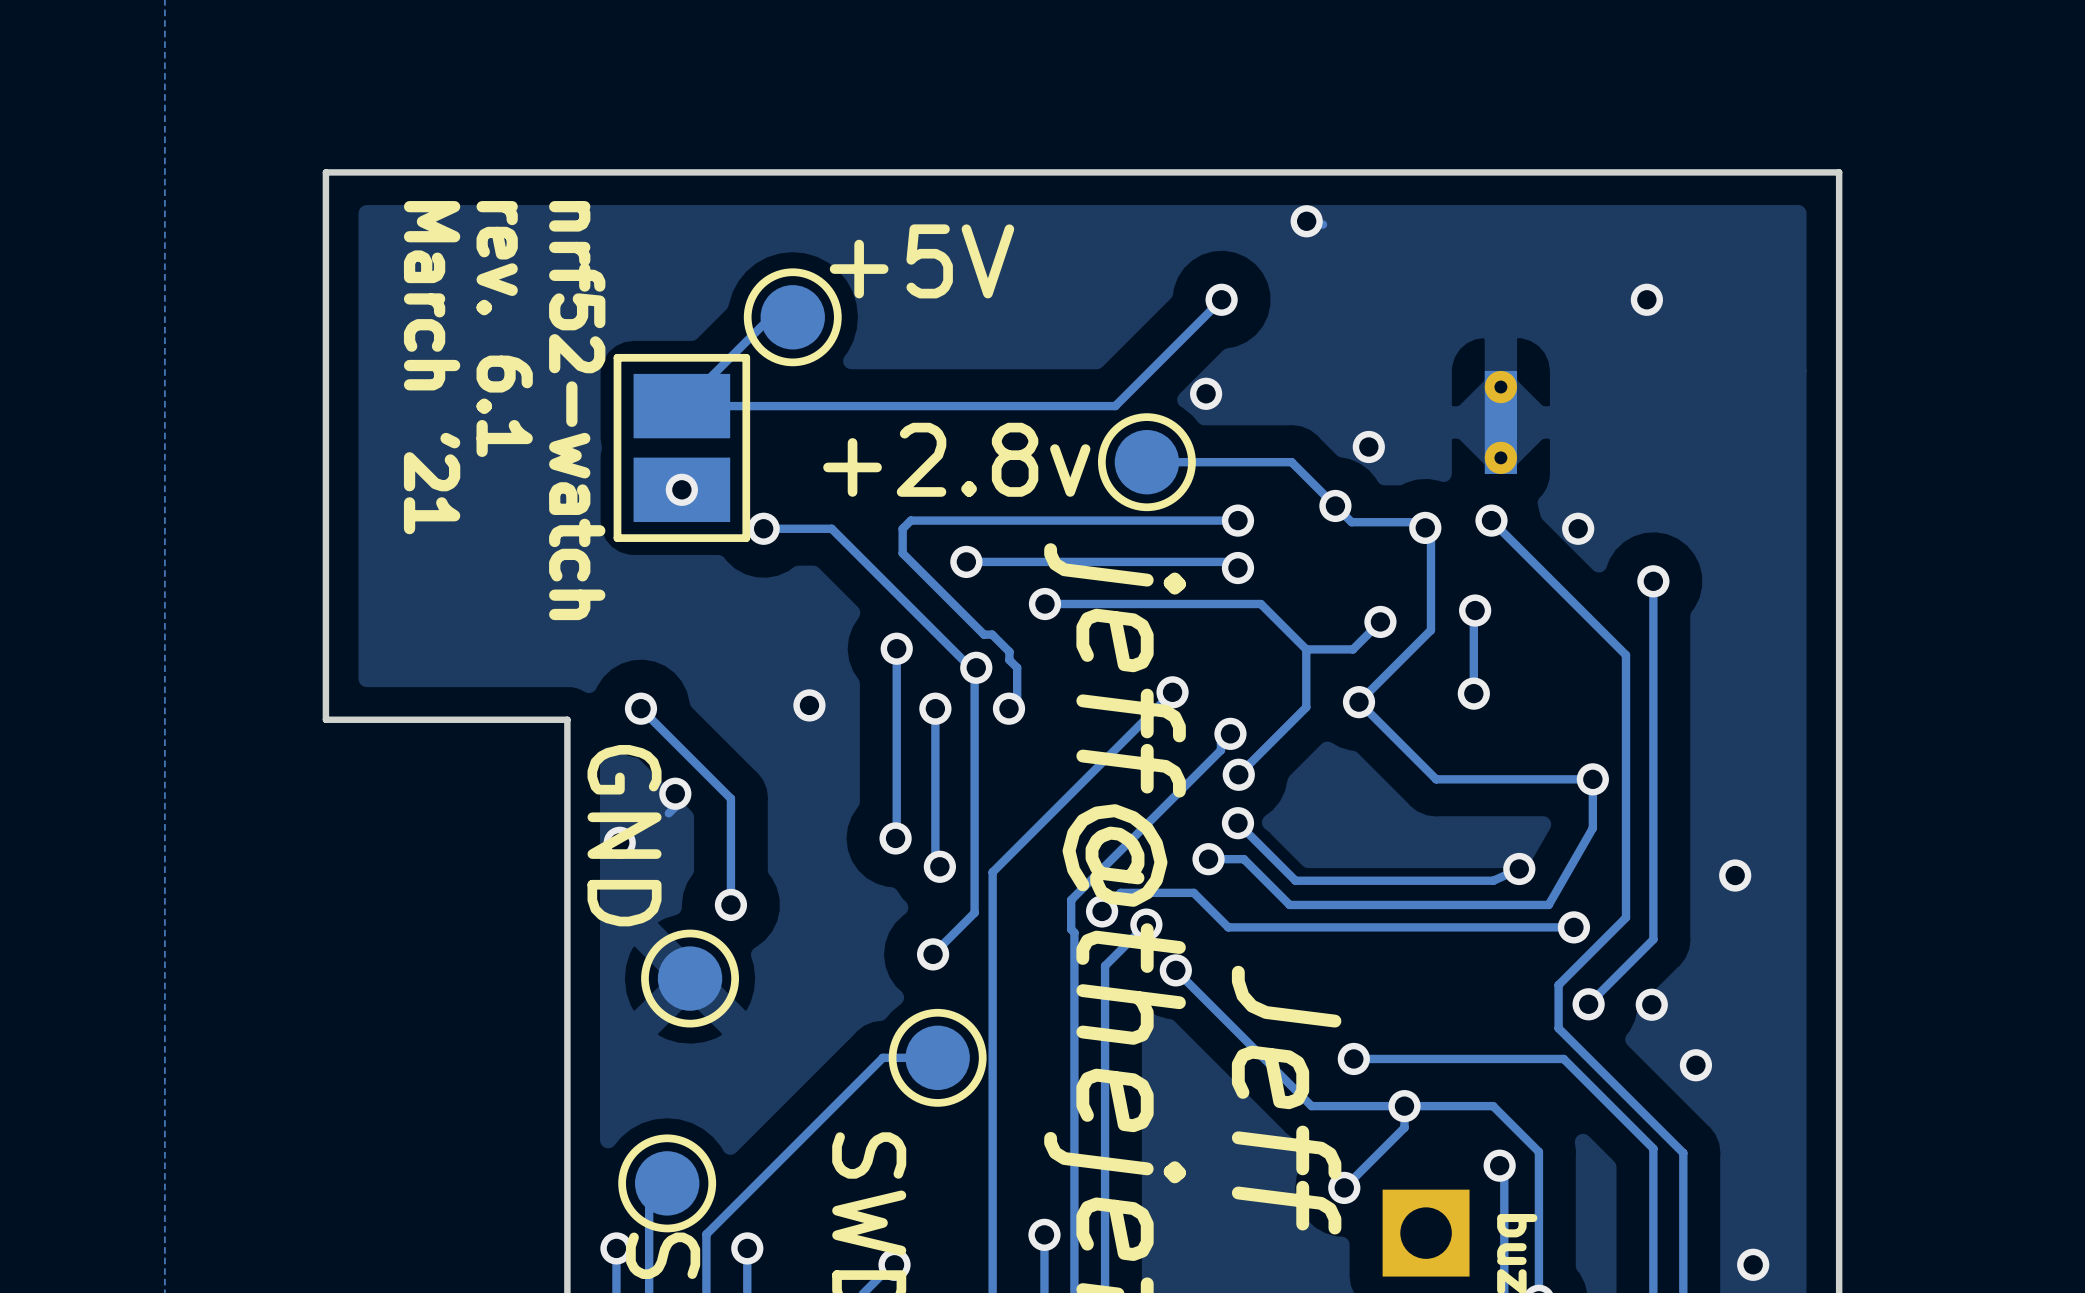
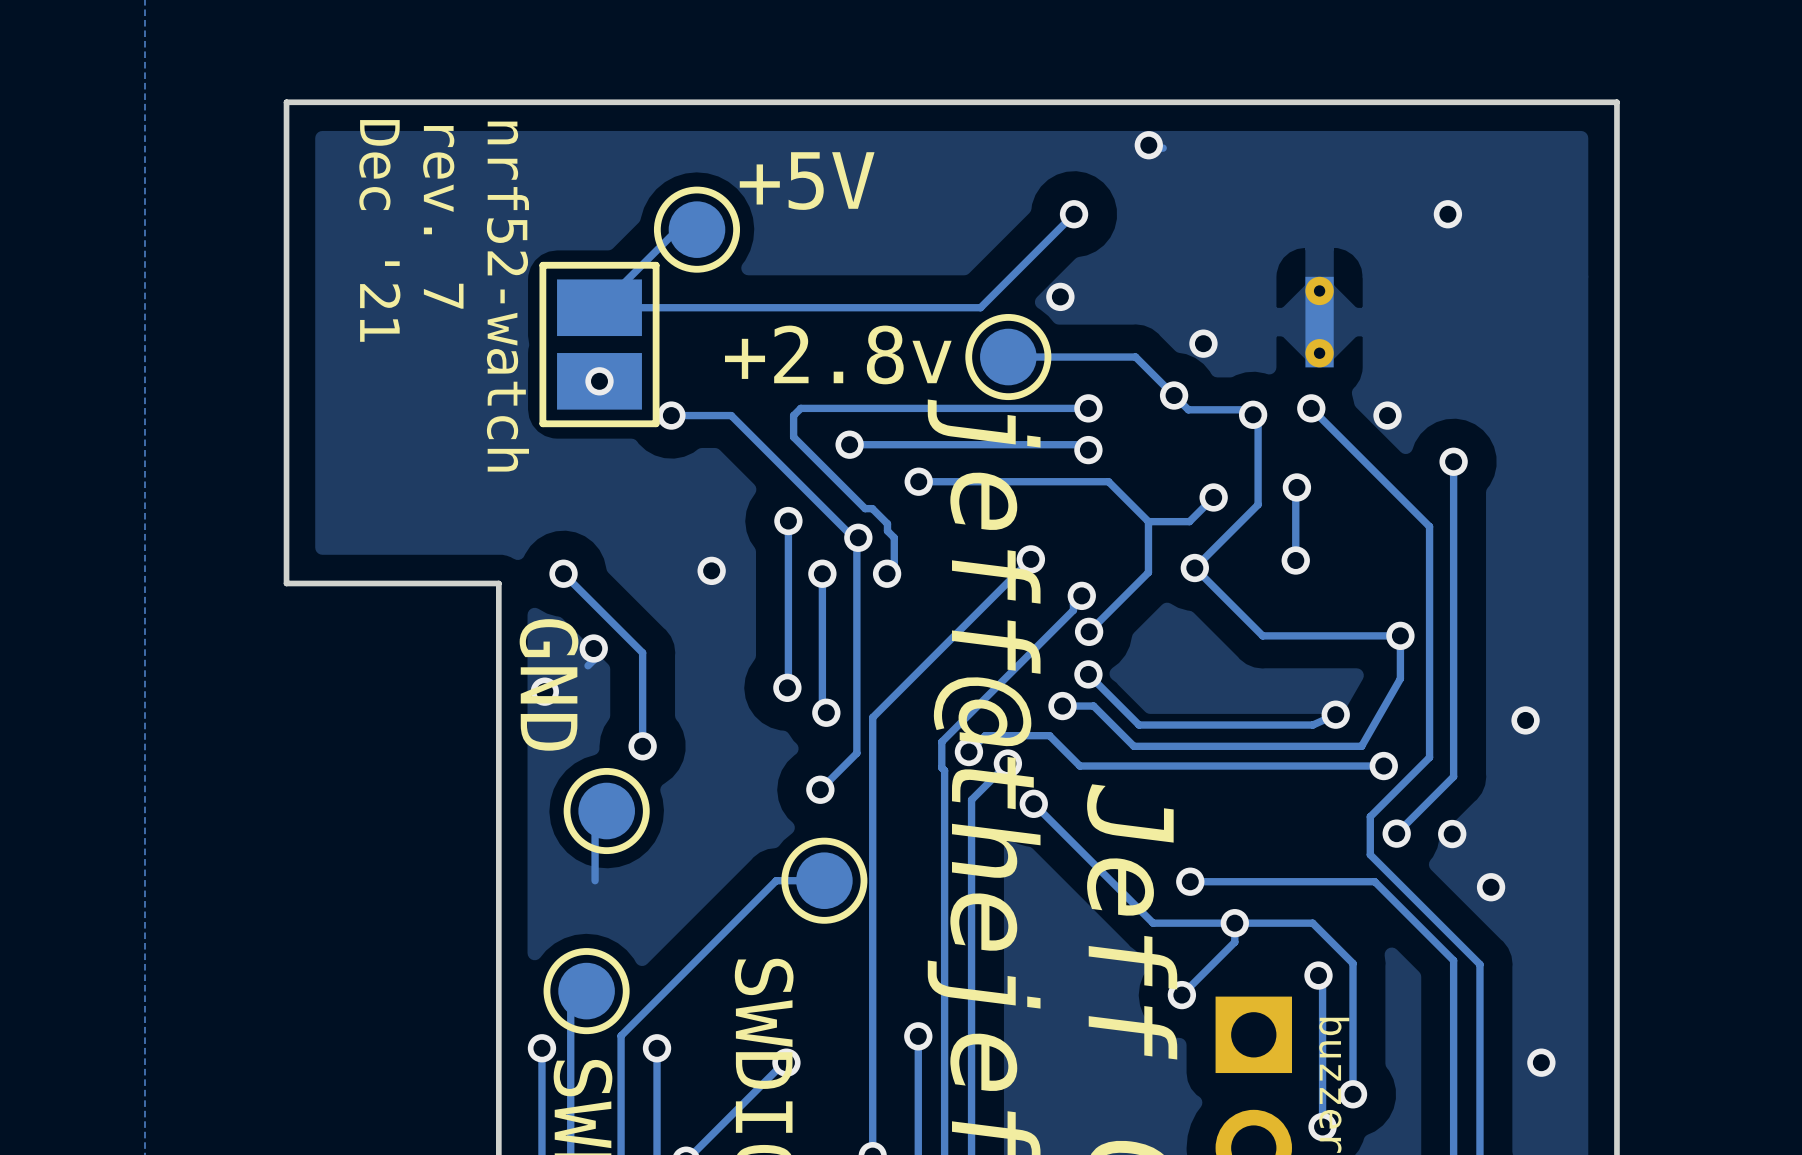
text: rev. 6.1 (504, 329) -> rev. 7 (443, 217)
text: March '21 (432, 367) -> Dec '21 (379, 230)
track: none -> (606, 811) (595, 822) (595, 880)

